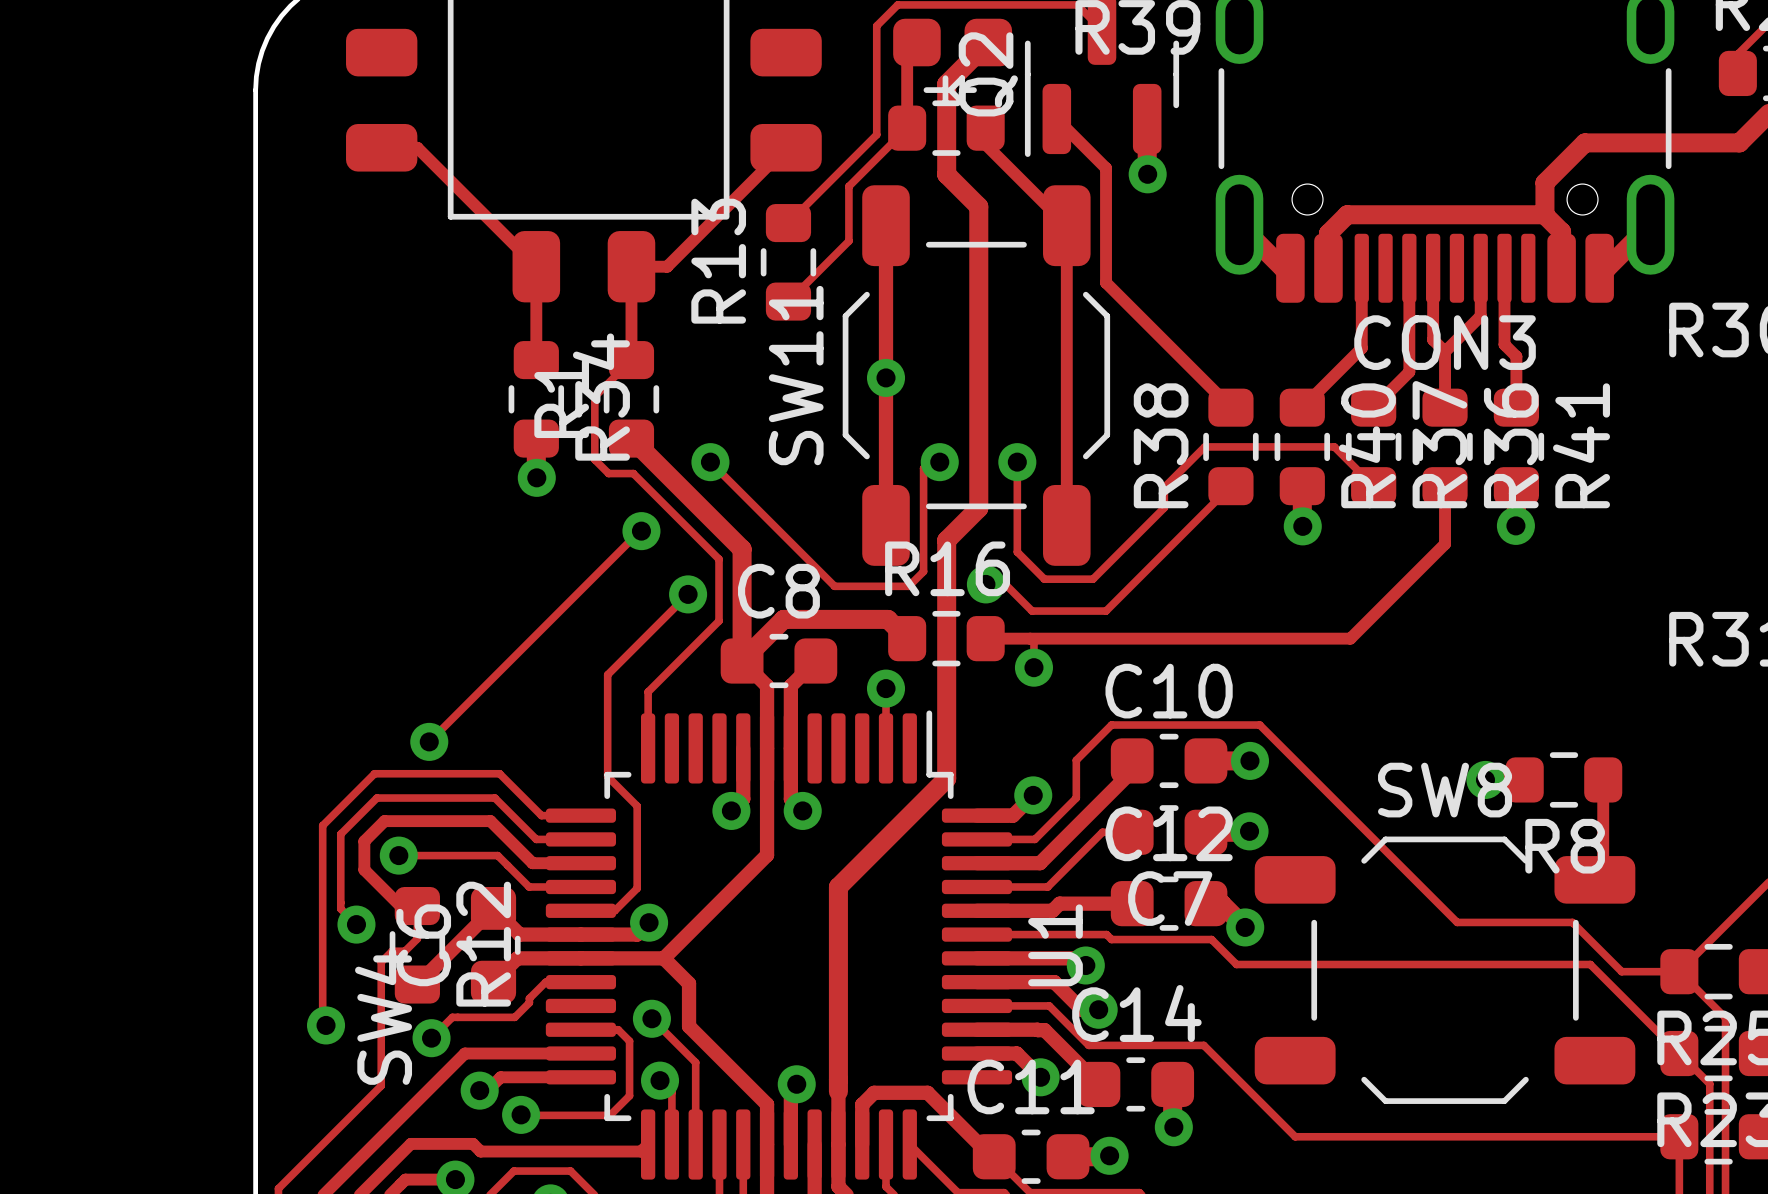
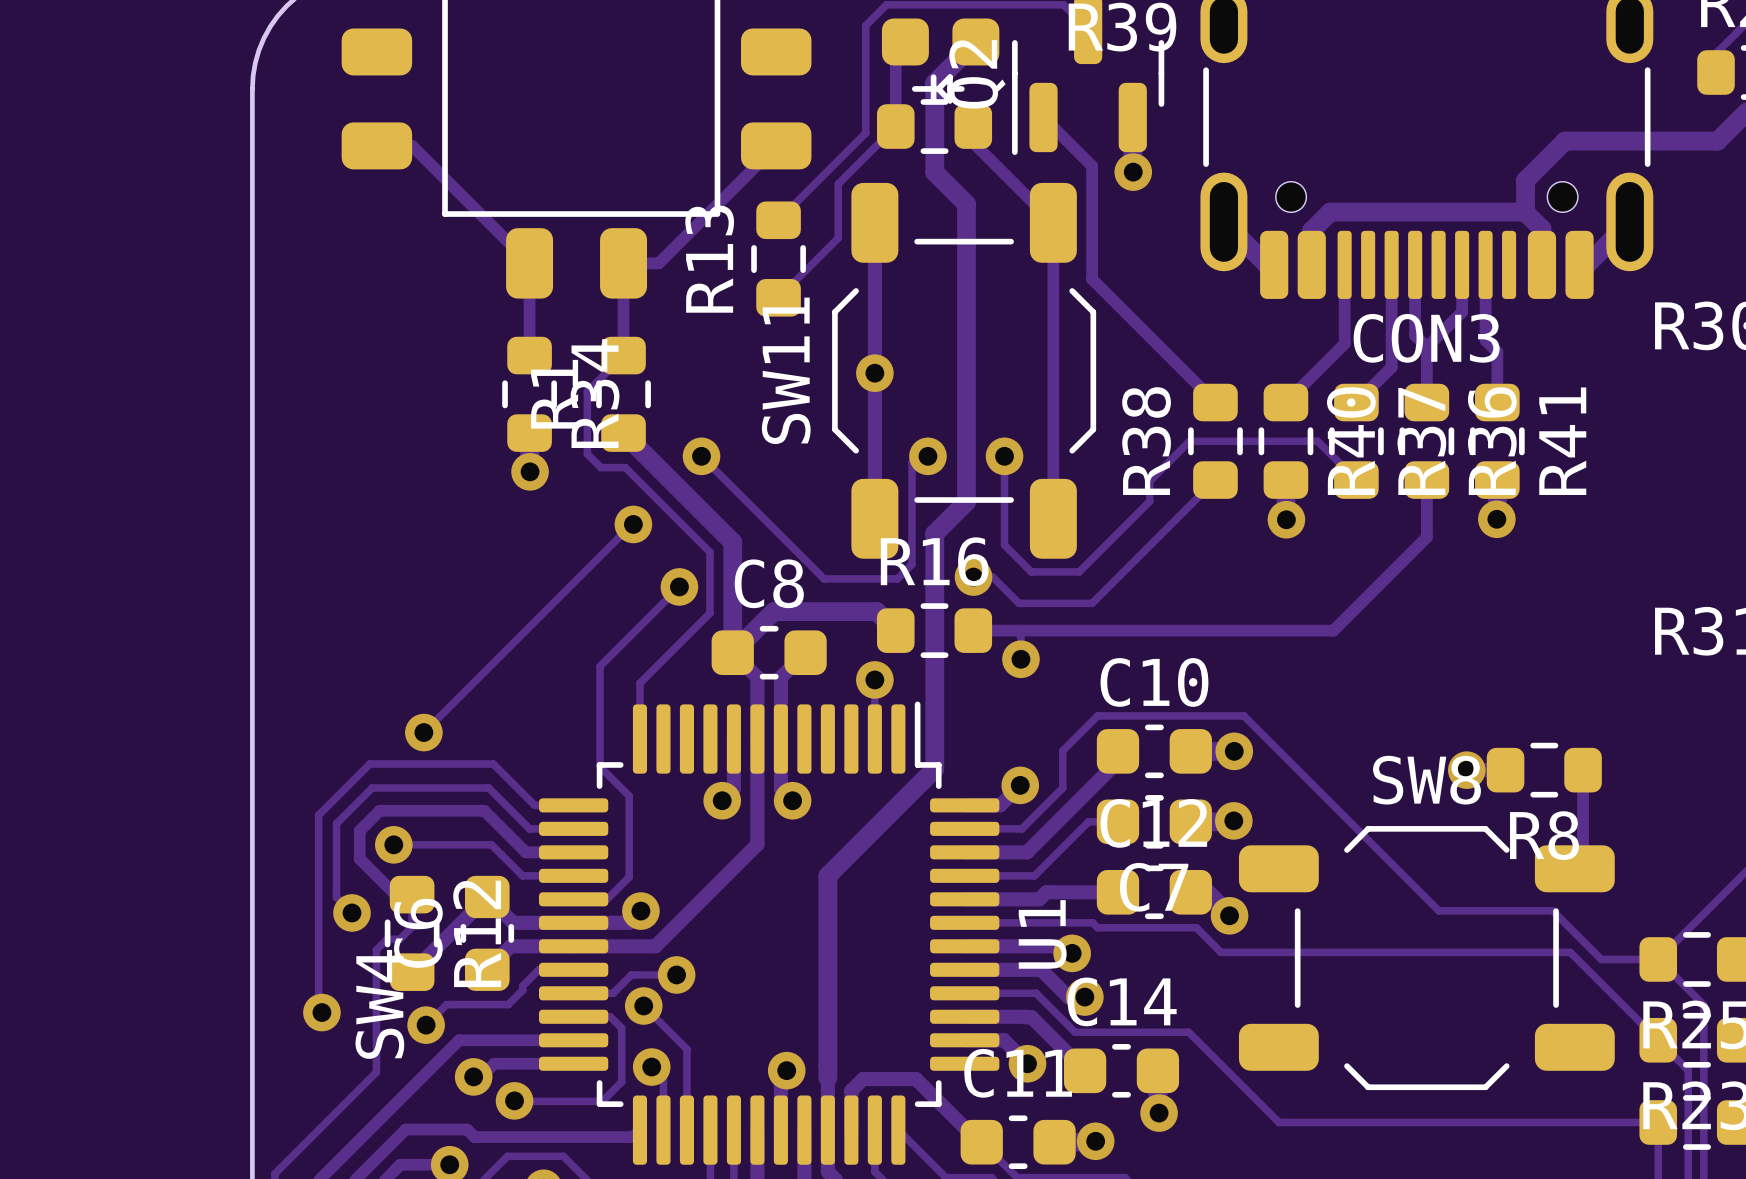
track: (663, 958) (689, 983) (689, 1026) (767, 1104) (767, 1144) -> none
track: none -> (676, 974) (631, 974) (613, 993) (573, 993)
via: none -> (676, 974)

